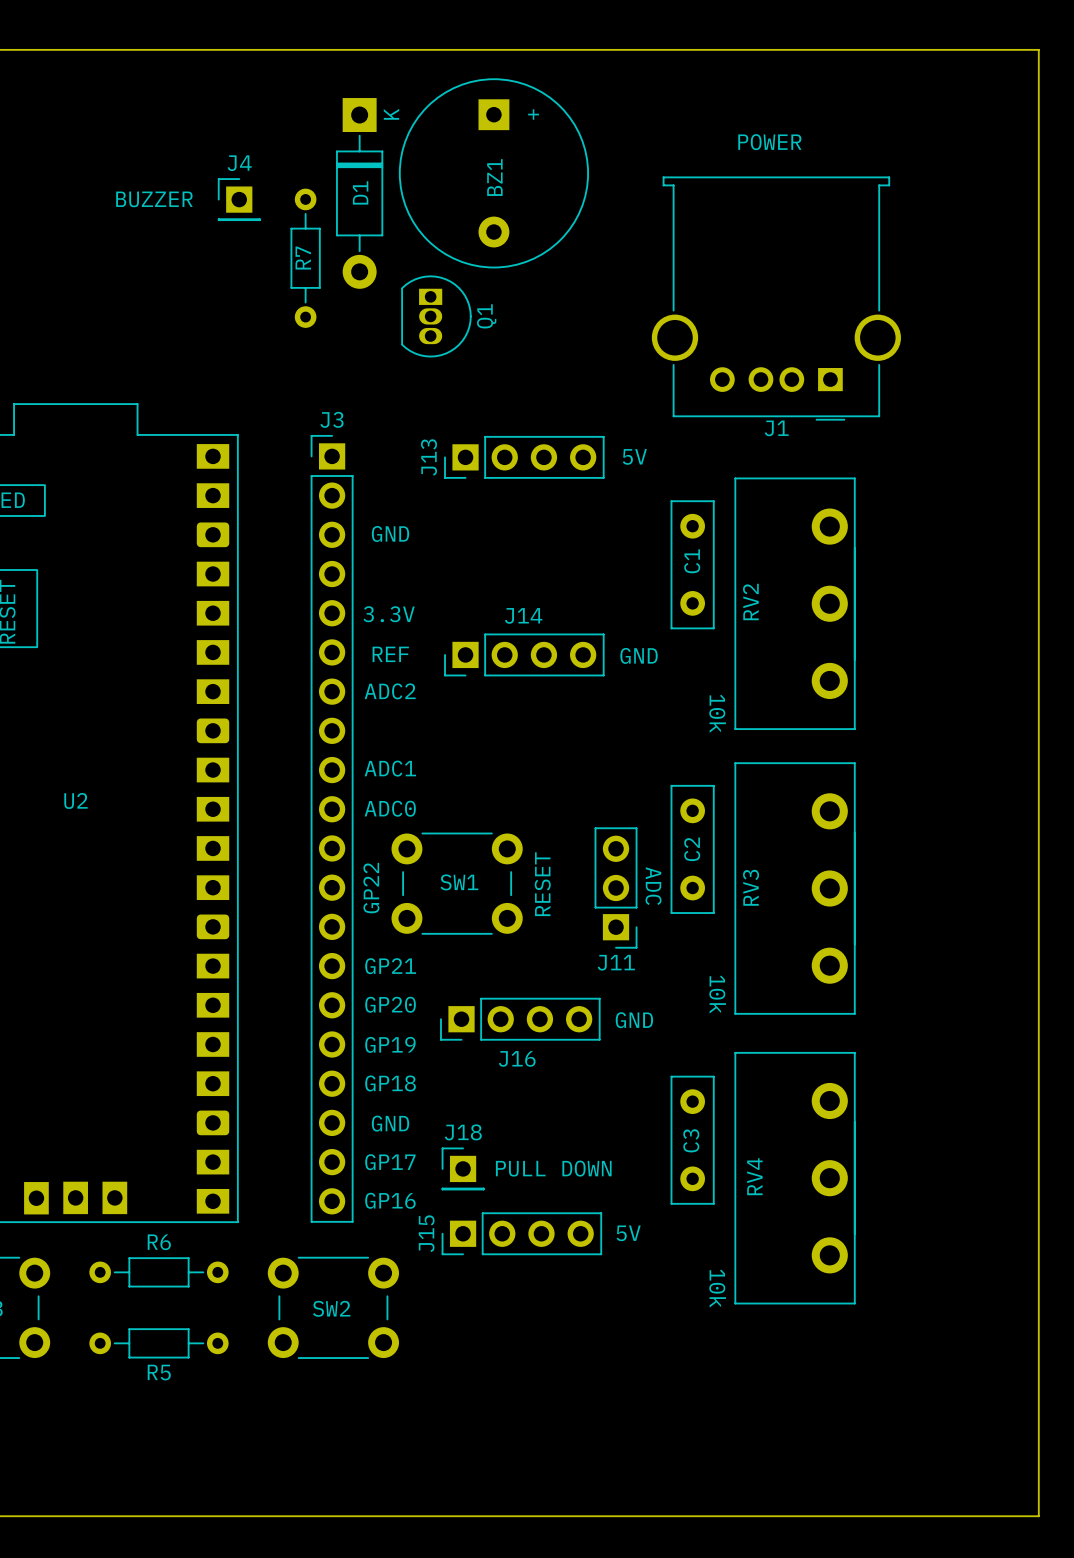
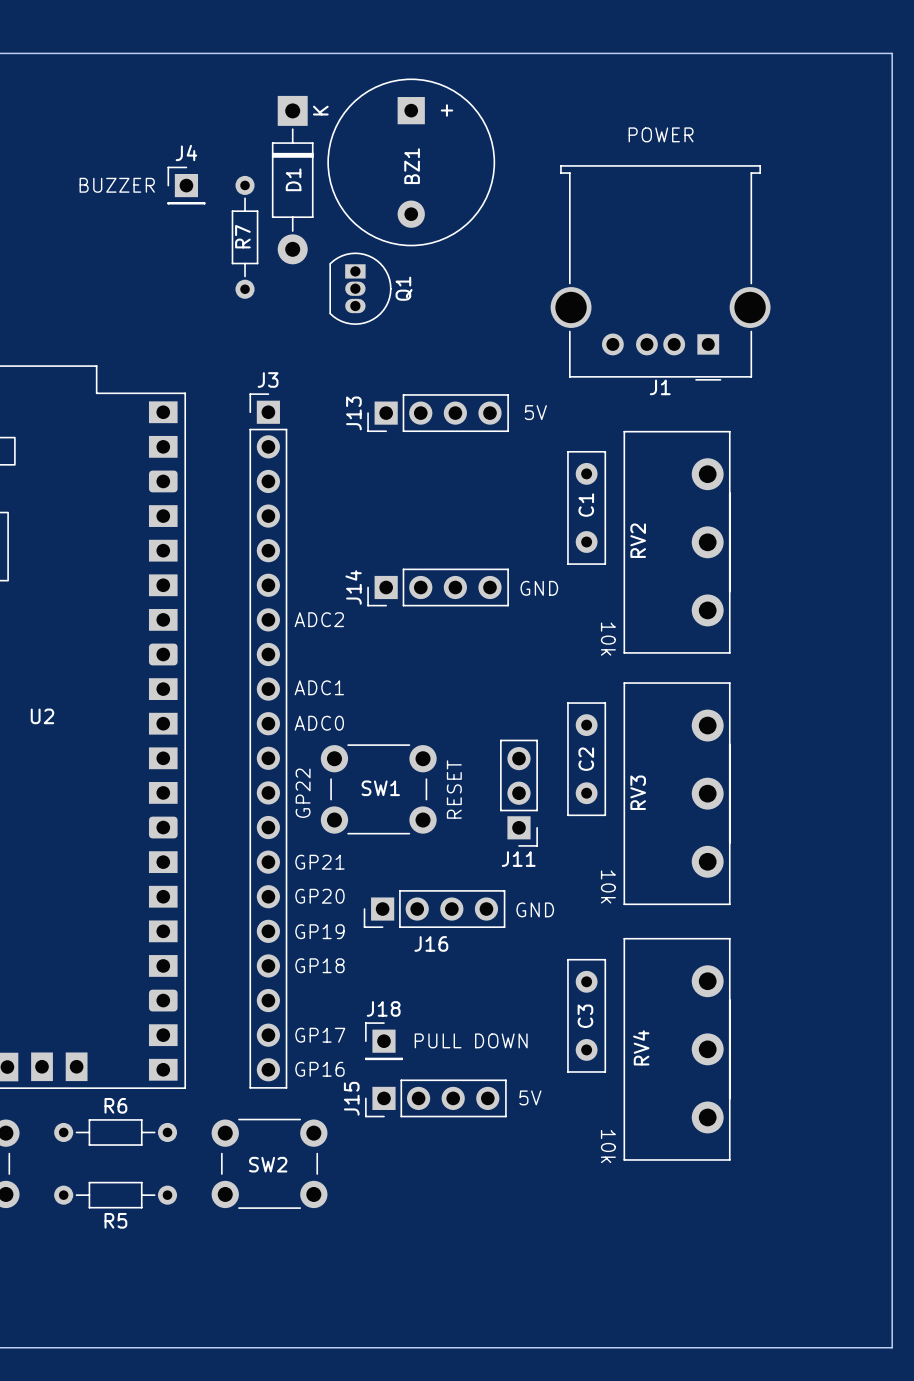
text: GND (390, 533) -> none
text: 3.3V (389, 614) -> none
J14 name rotation: 0° (523, 615) -> 90° counterclockwise (353, 587)
J14 name position: J14 (523, 615) -> J14 (353, 587)
text: REF (390, 654) -> none
text: ADC (653, 886) -> none
text: GND (390, 1123) -> none

